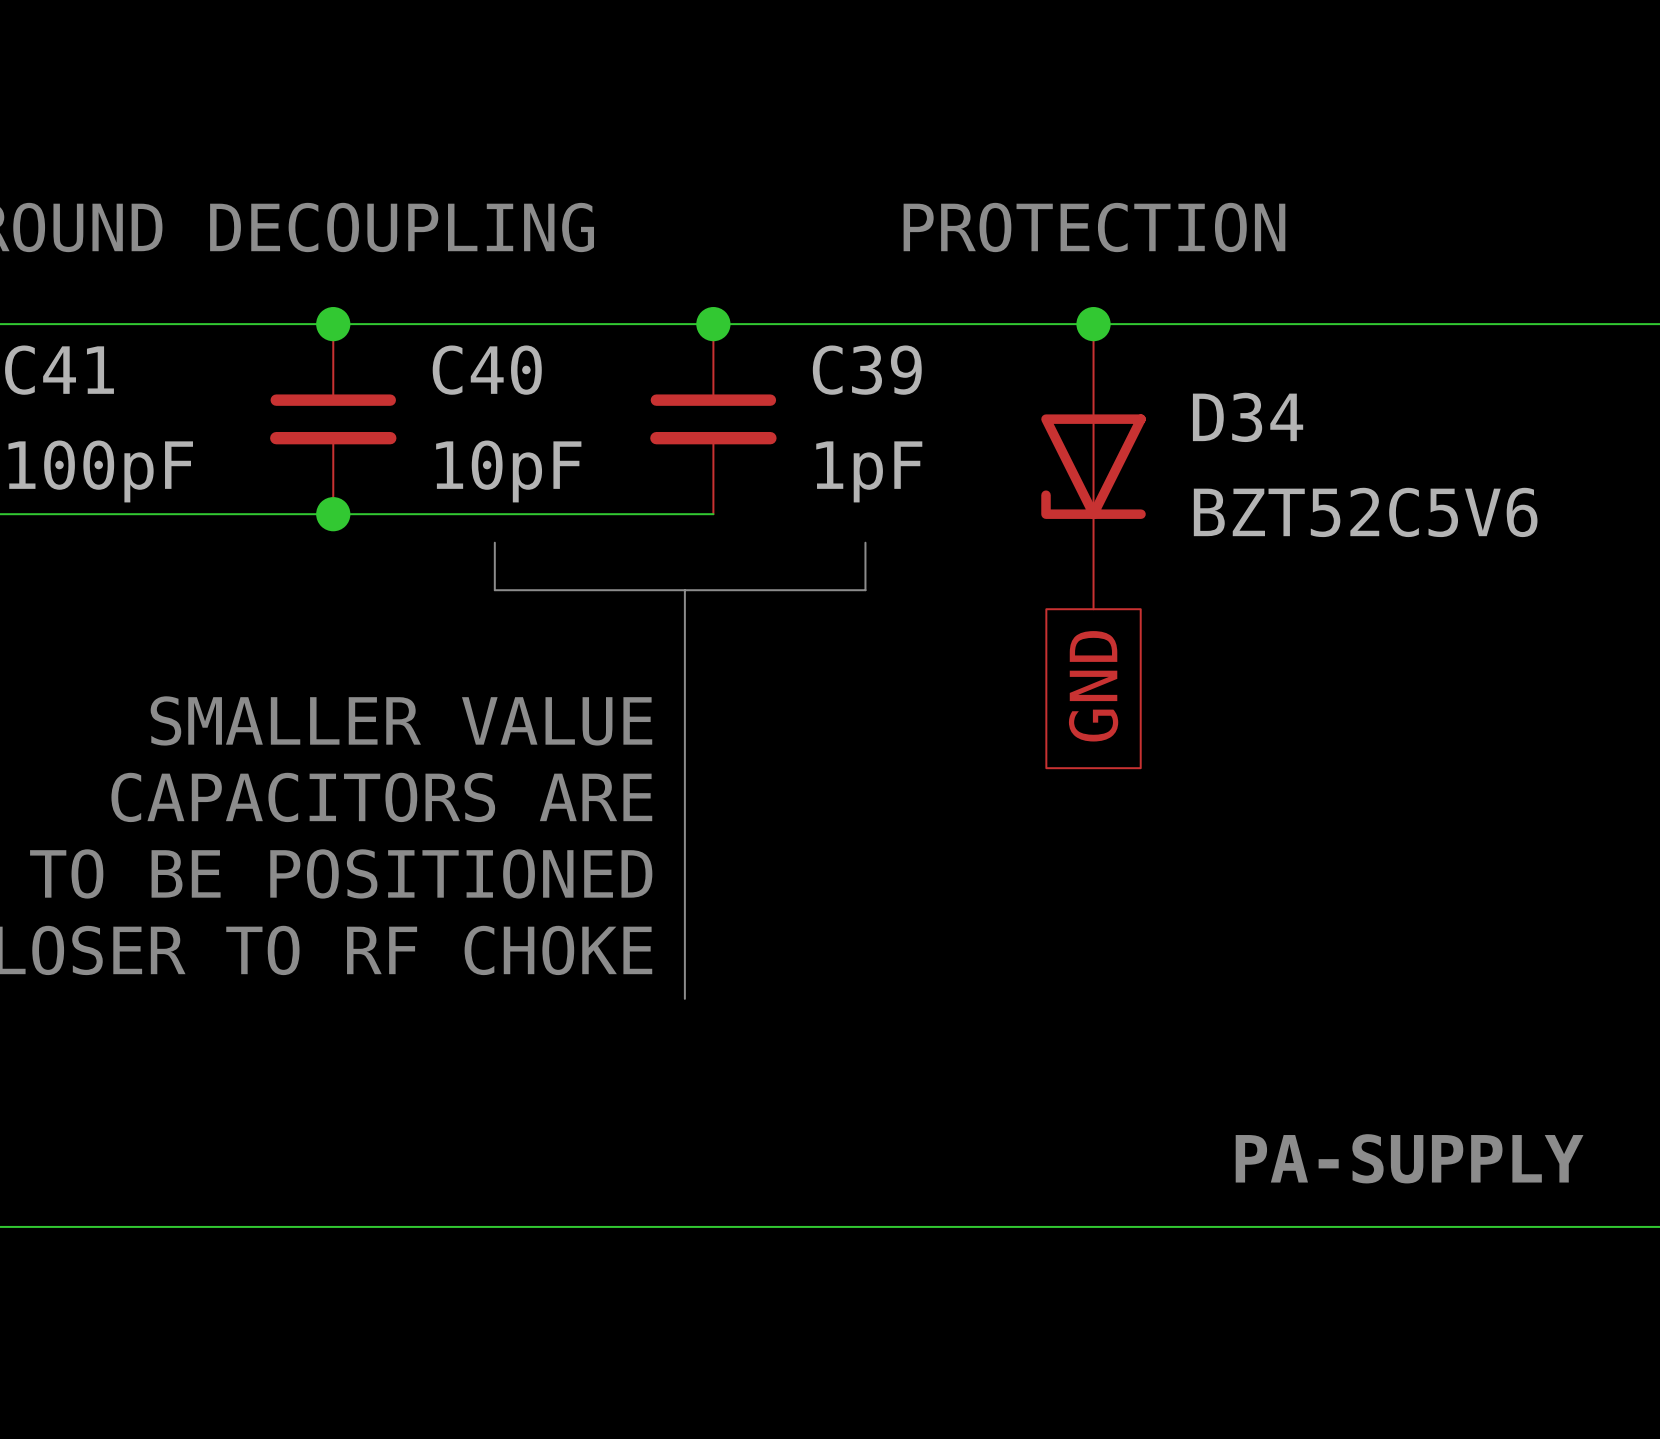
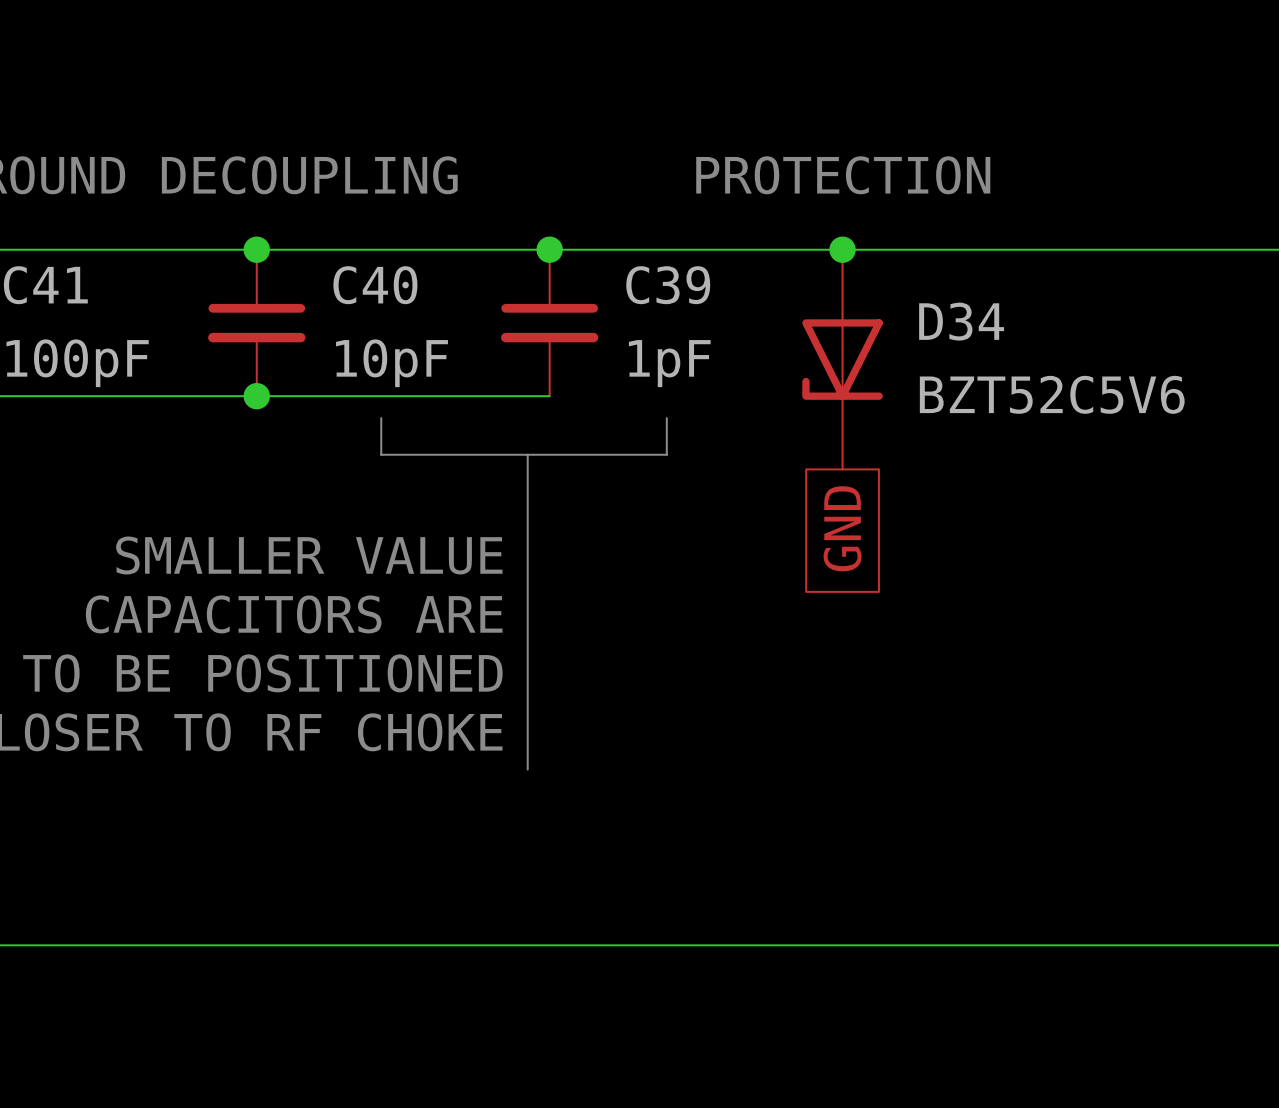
text: PA-SUPPLY (1409, 1158) -> none

